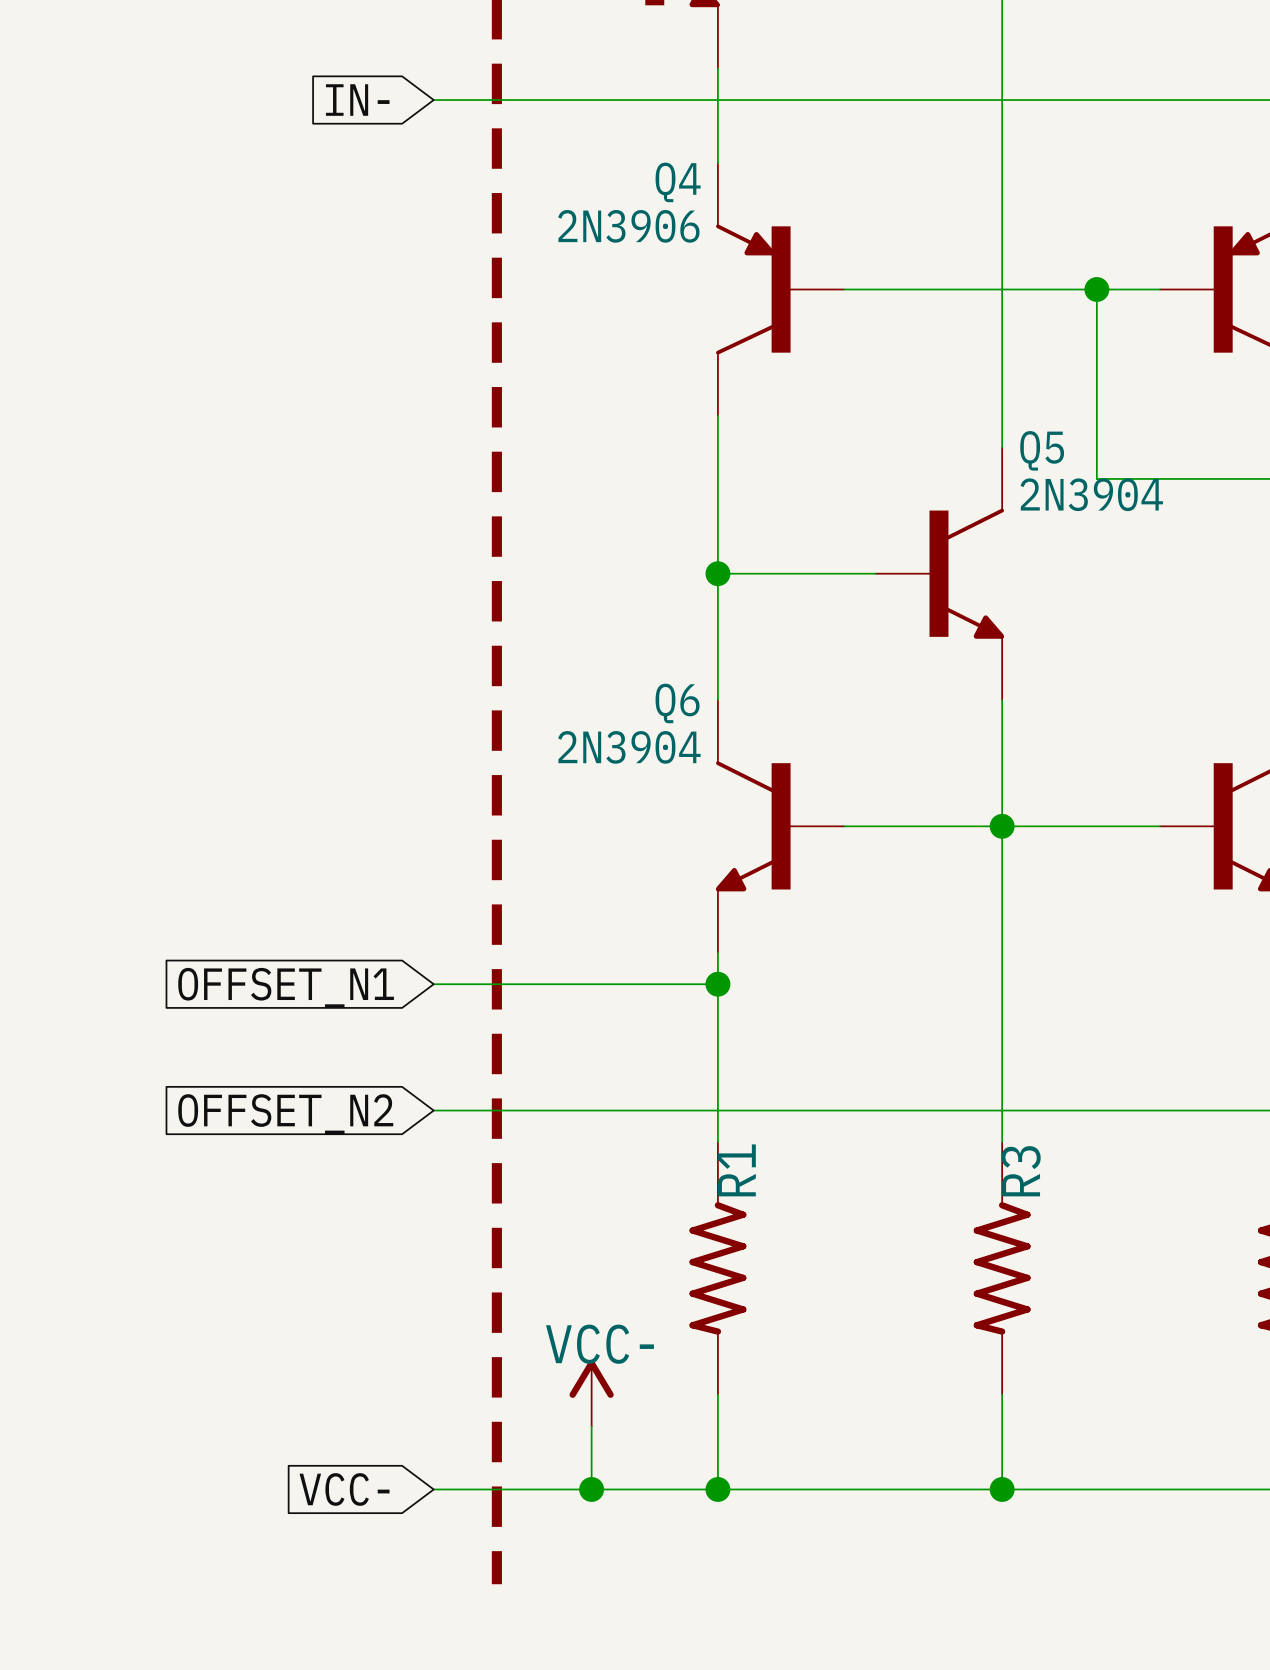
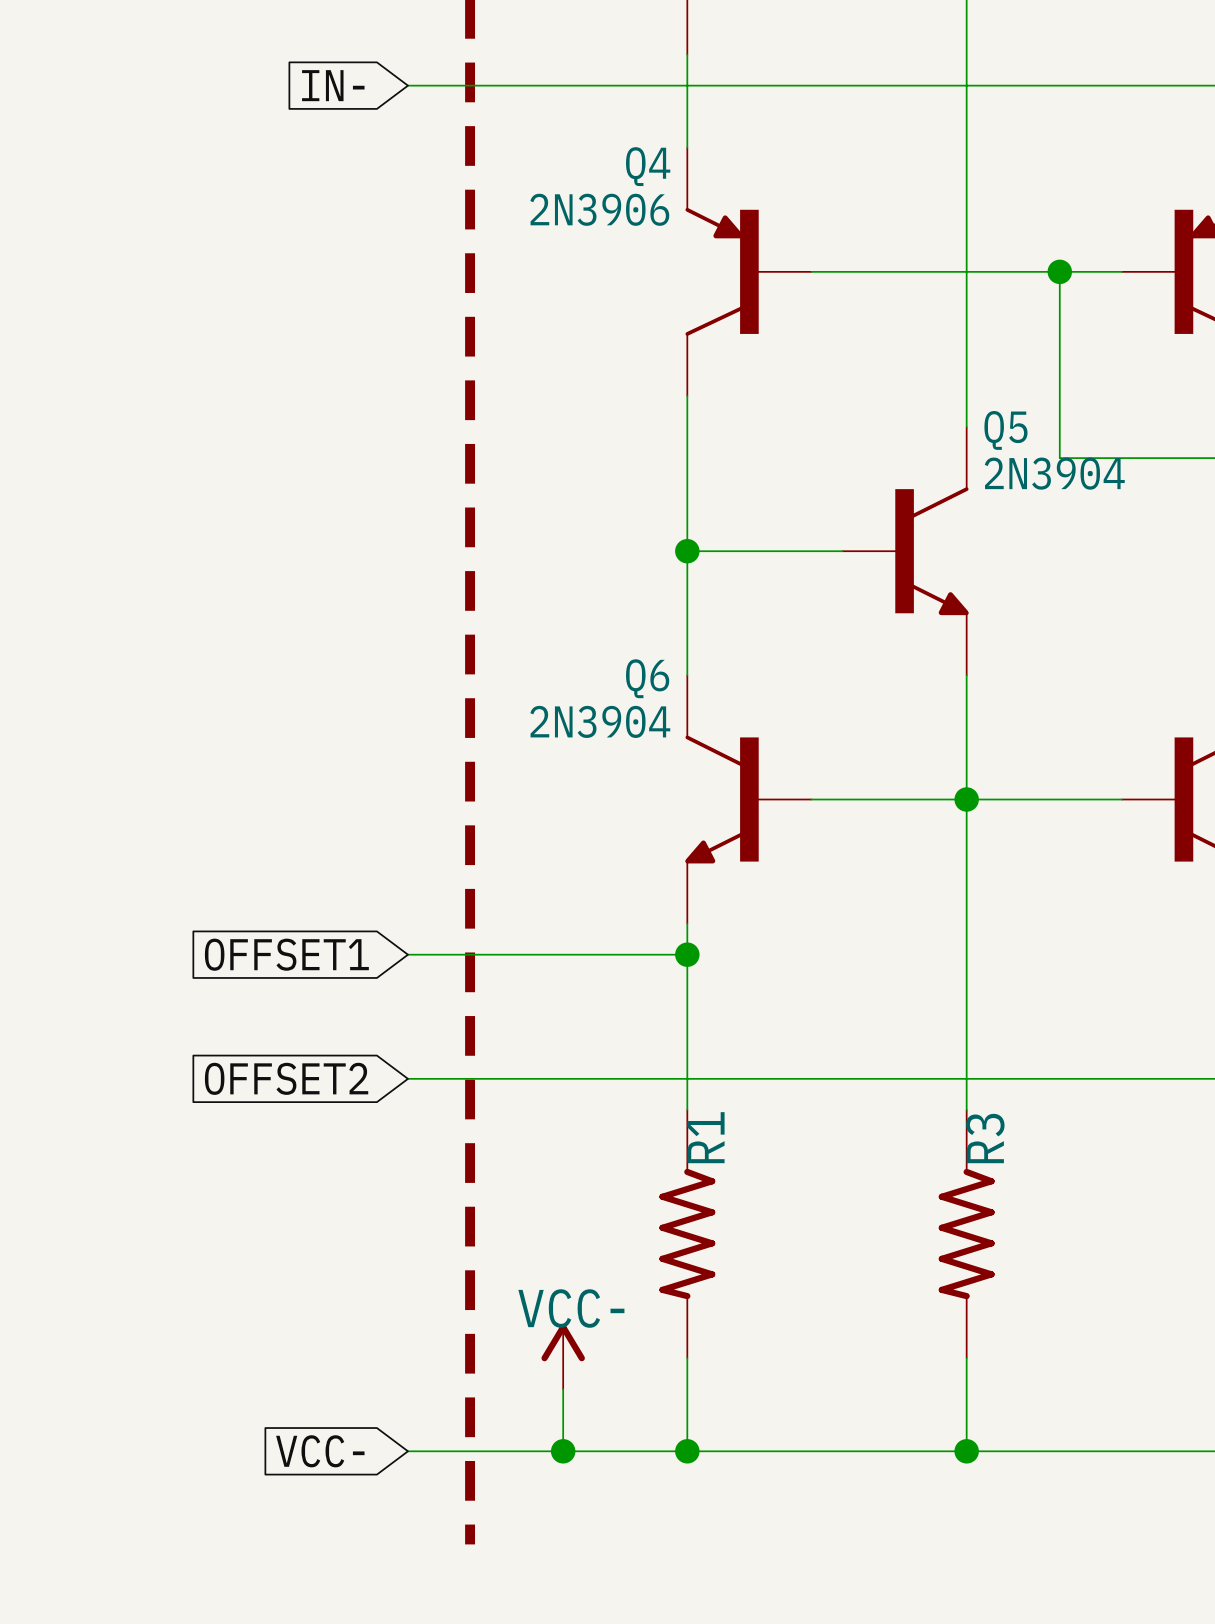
global label: OFFSET_N1 (286, 987) -> OFFSET1 (286, 954)
global label: OFFSET_N2 (285, 1114) -> OFFSET2 (286, 1078)

